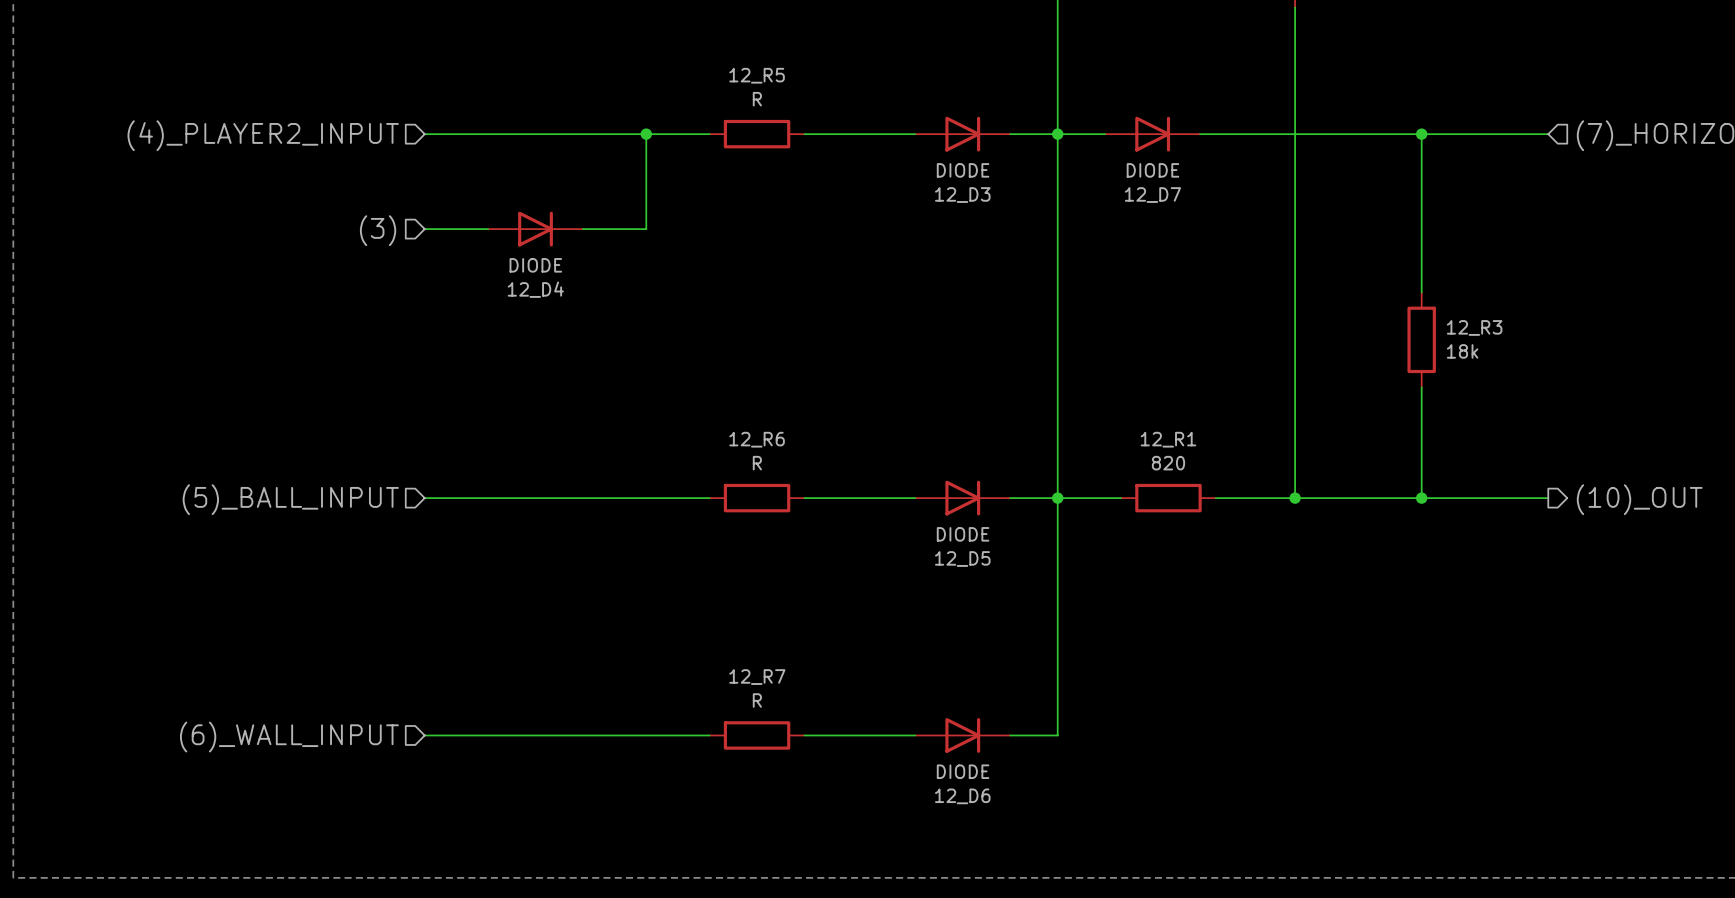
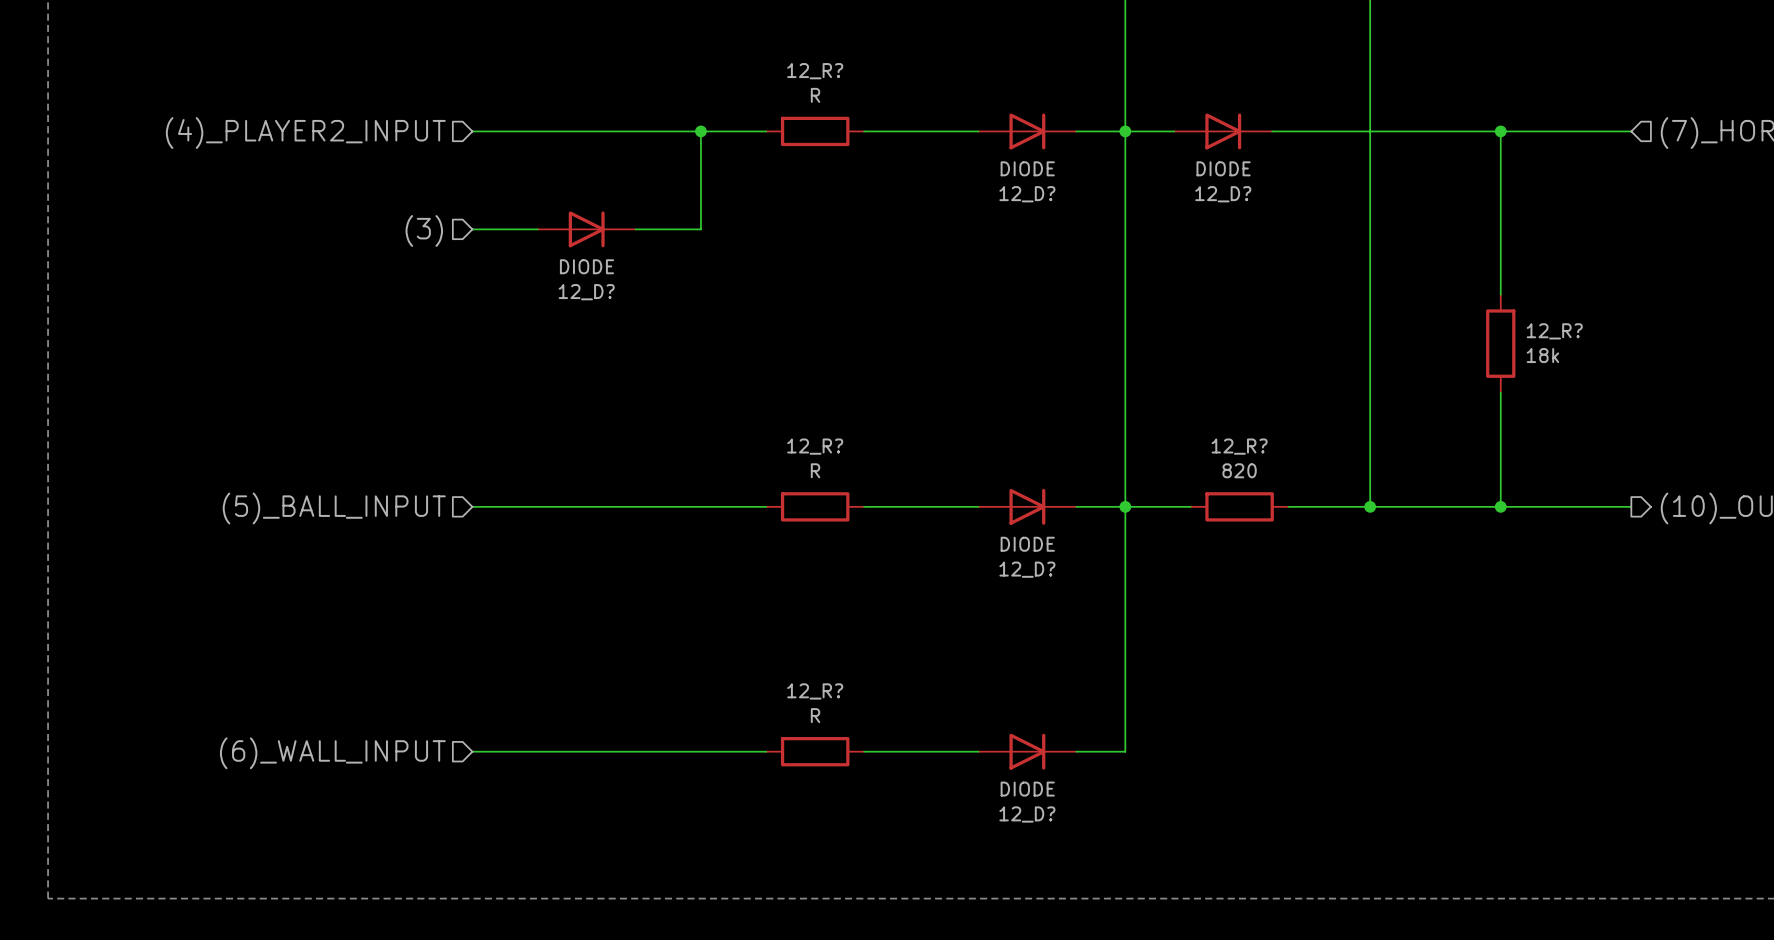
12_R5 name: 12_R5 (757, 75) -> 12_R? (815, 71)
12_D3 name: 12_D3 (962, 195) -> 12_D? (1027, 194)
12_D7 name: 12_D7 (1152, 195) -> 12_D? (1223, 194)
12_D4 name: 12_D4 (535, 289) -> 12_D? (586, 292)
12_R3 name: 12_R3 (1474, 327) -> 12_R? (1554, 331)
12_R6 name: 12_R6 (757, 439) -> 12_R? (815, 446)
12_R1 name: 12_R1 (1168, 439) -> 12_R? (1239, 446)
12_D5 name: 12_D5 (962, 559) -> 12_D? (1027, 569)
12_R7 name: 12_R7 (757, 677) -> 12_R? (815, 691)
12_D6 name: 12_D6 (962, 796) -> 12_D? (1027, 814)

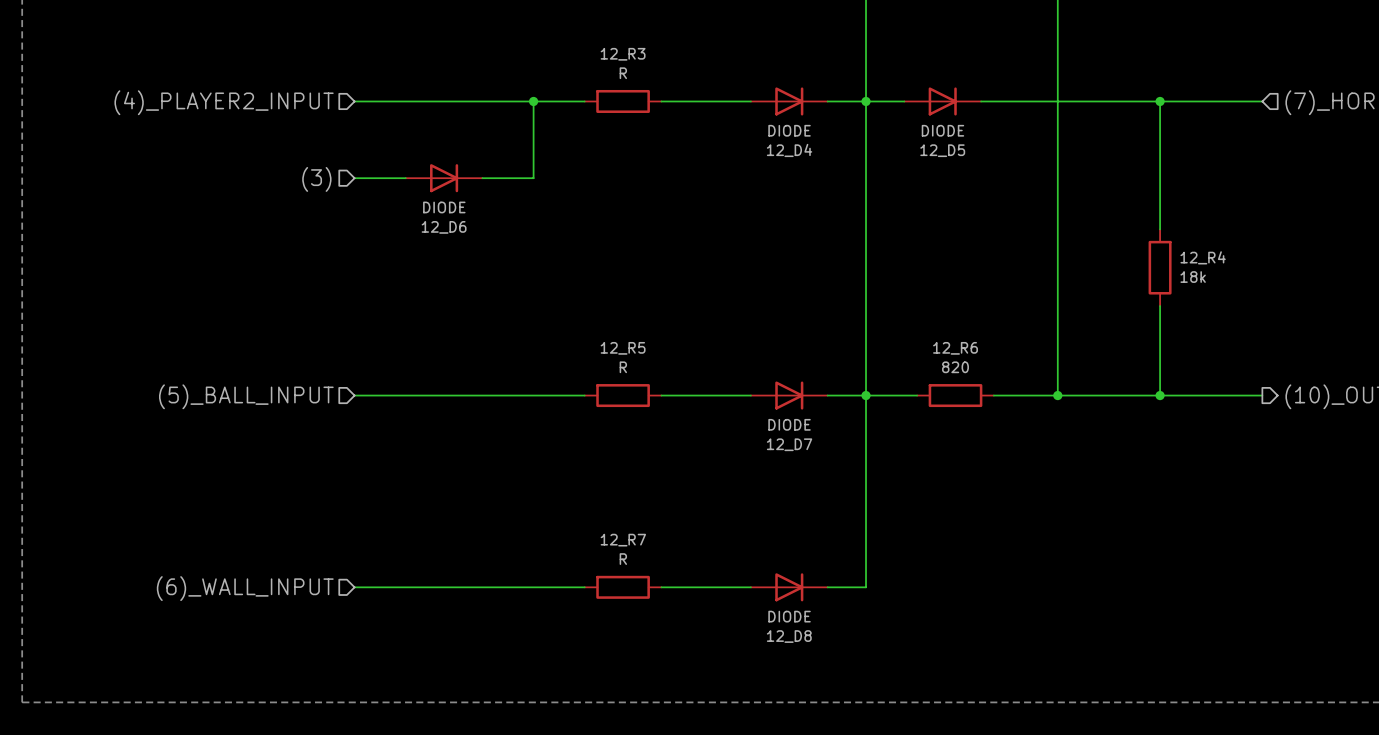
12_R? name: 12_R? (815, 71) -> 12_R3 (623, 54)
12_D? name: 12_D? (1027, 194) -> 12_D4 (789, 150)
12_D? name: 12_D? (1223, 194) -> 12_D5 (942, 150)
12_D? name: 12_D? (586, 292) -> 12_D6 (444, 227)
12_R? name: 12_R? (1554, 331) -> 12_R4 (1203, 257)
12_R? name: 12_R? (815, 446) -> 12_R5 (623, 348)
12_R? name: 12_R? (1239, 446) -> 12_R6 (955, 348)
12_D? name: 12_D? (1027, 569) -> 12_D7 (789, 444)
12_R? name: 12_R? (815, 691) -> 12_R7 (623, 540)
12_D? name: 12_D? (1027, 814) -> 12_D8 (789, 636)

